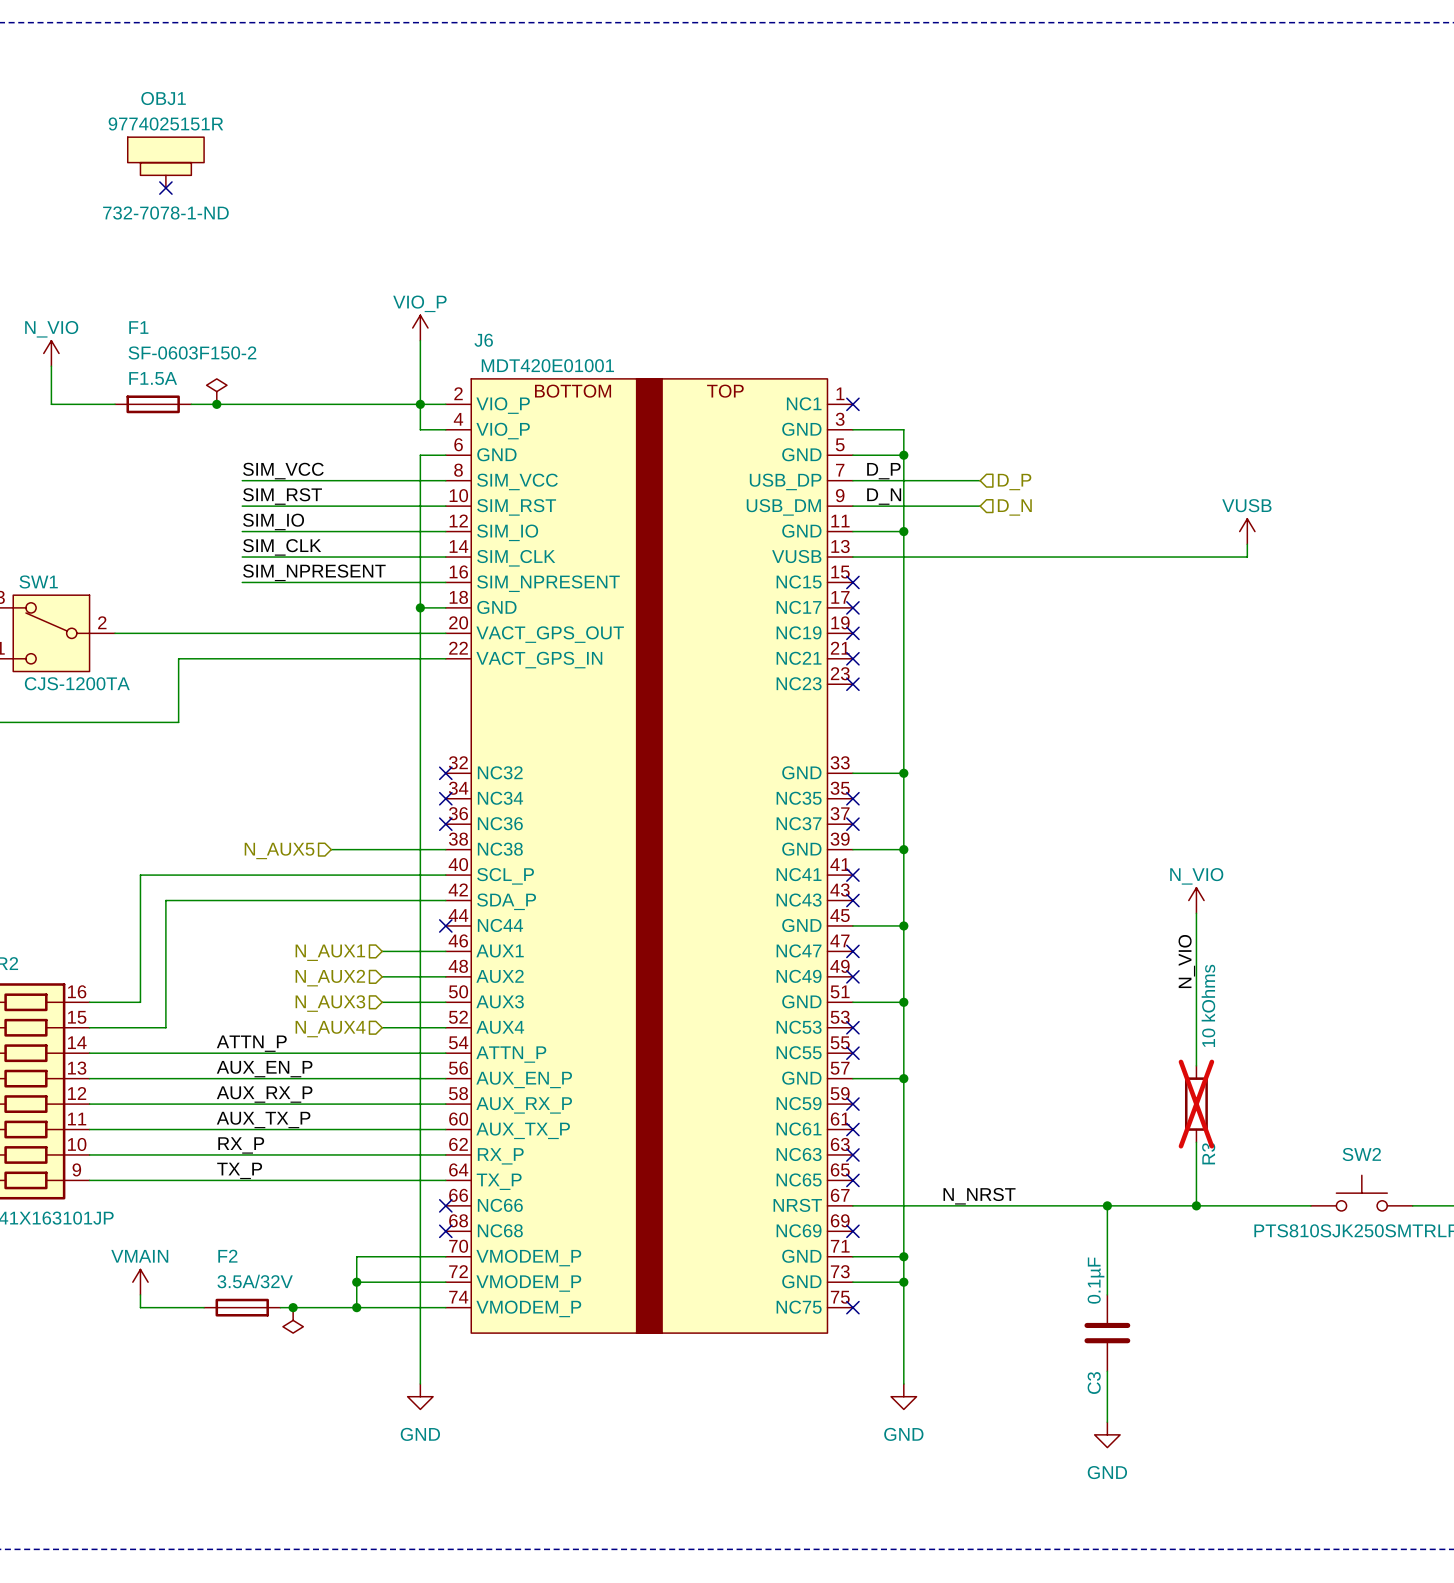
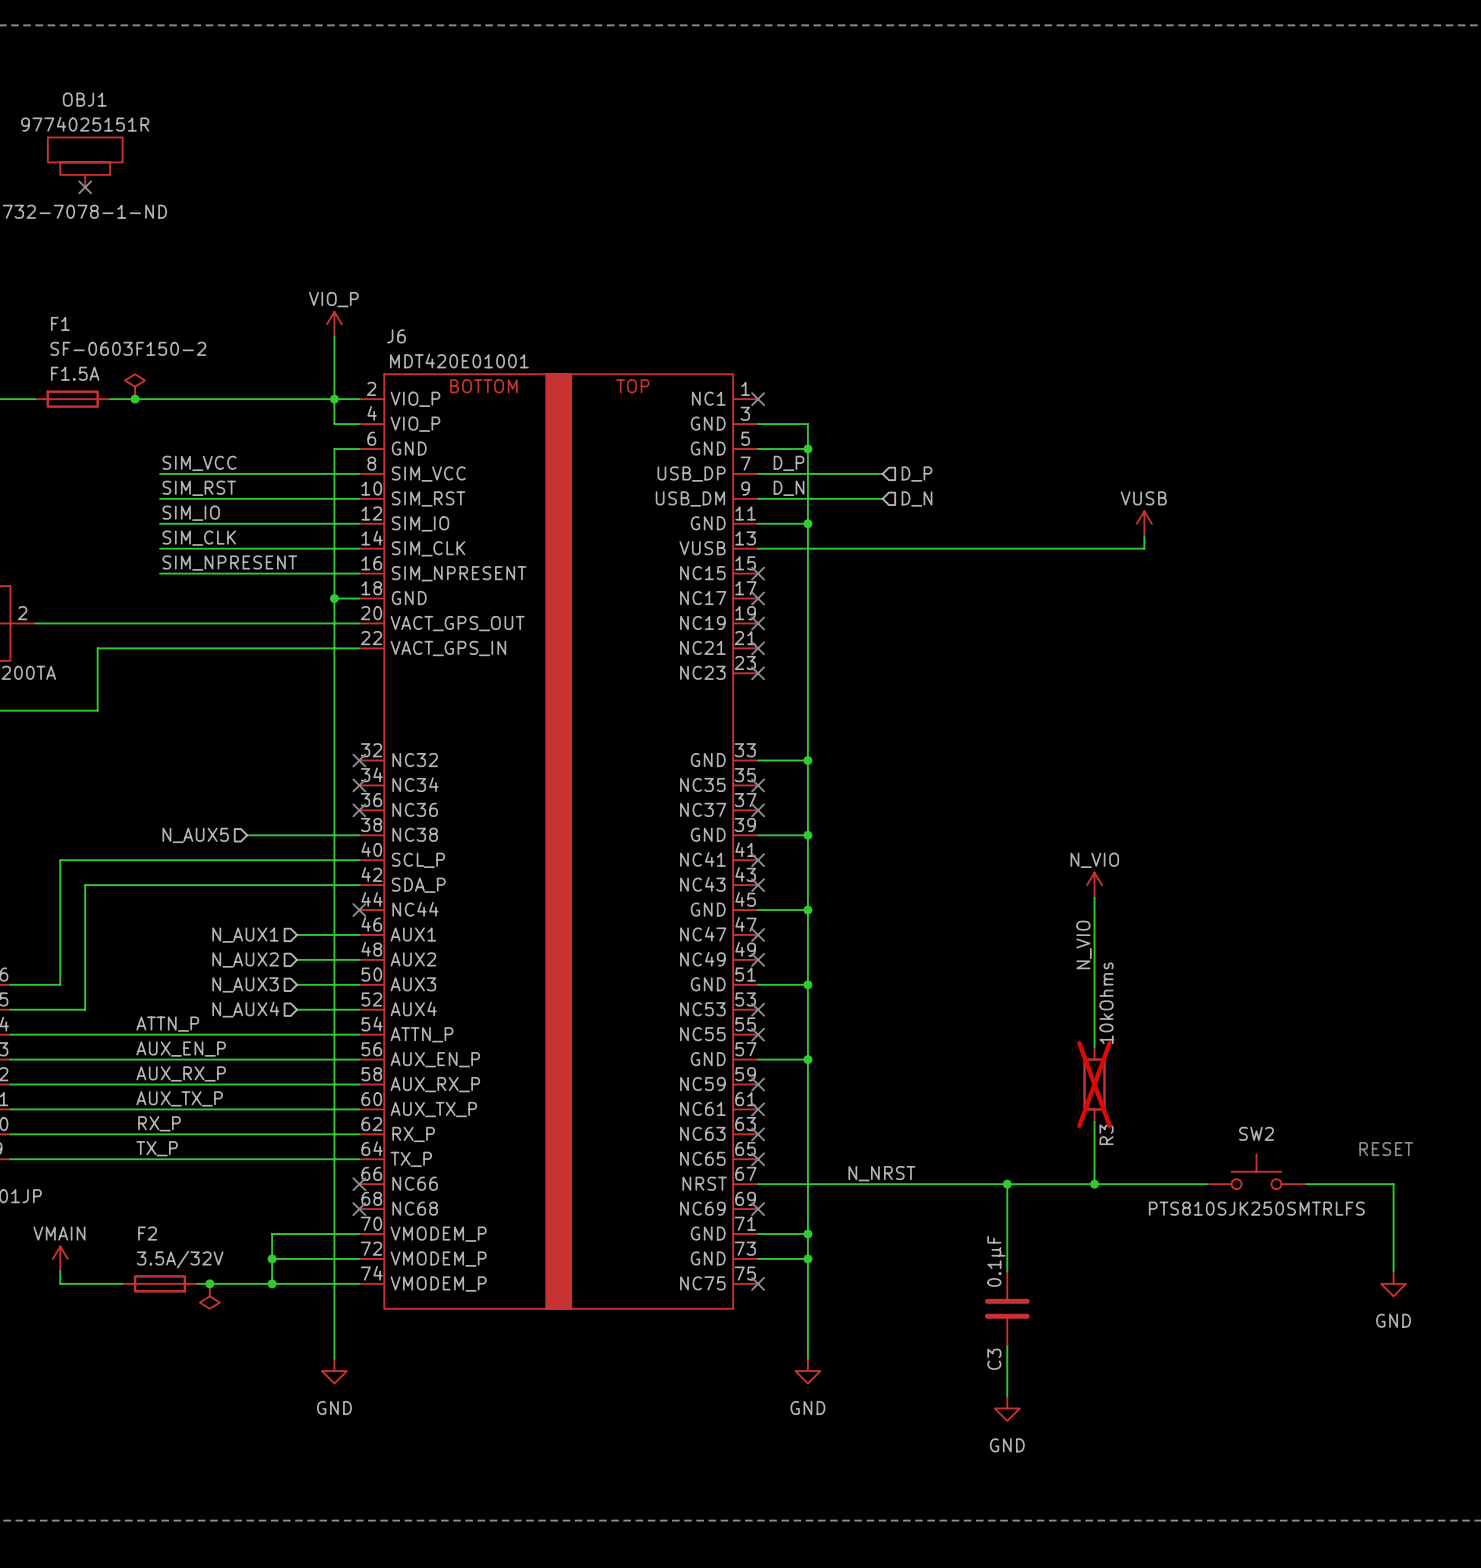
R3 value: 10 kOhms (1208, 1005) -> 10kOhms (1106, 1003)

